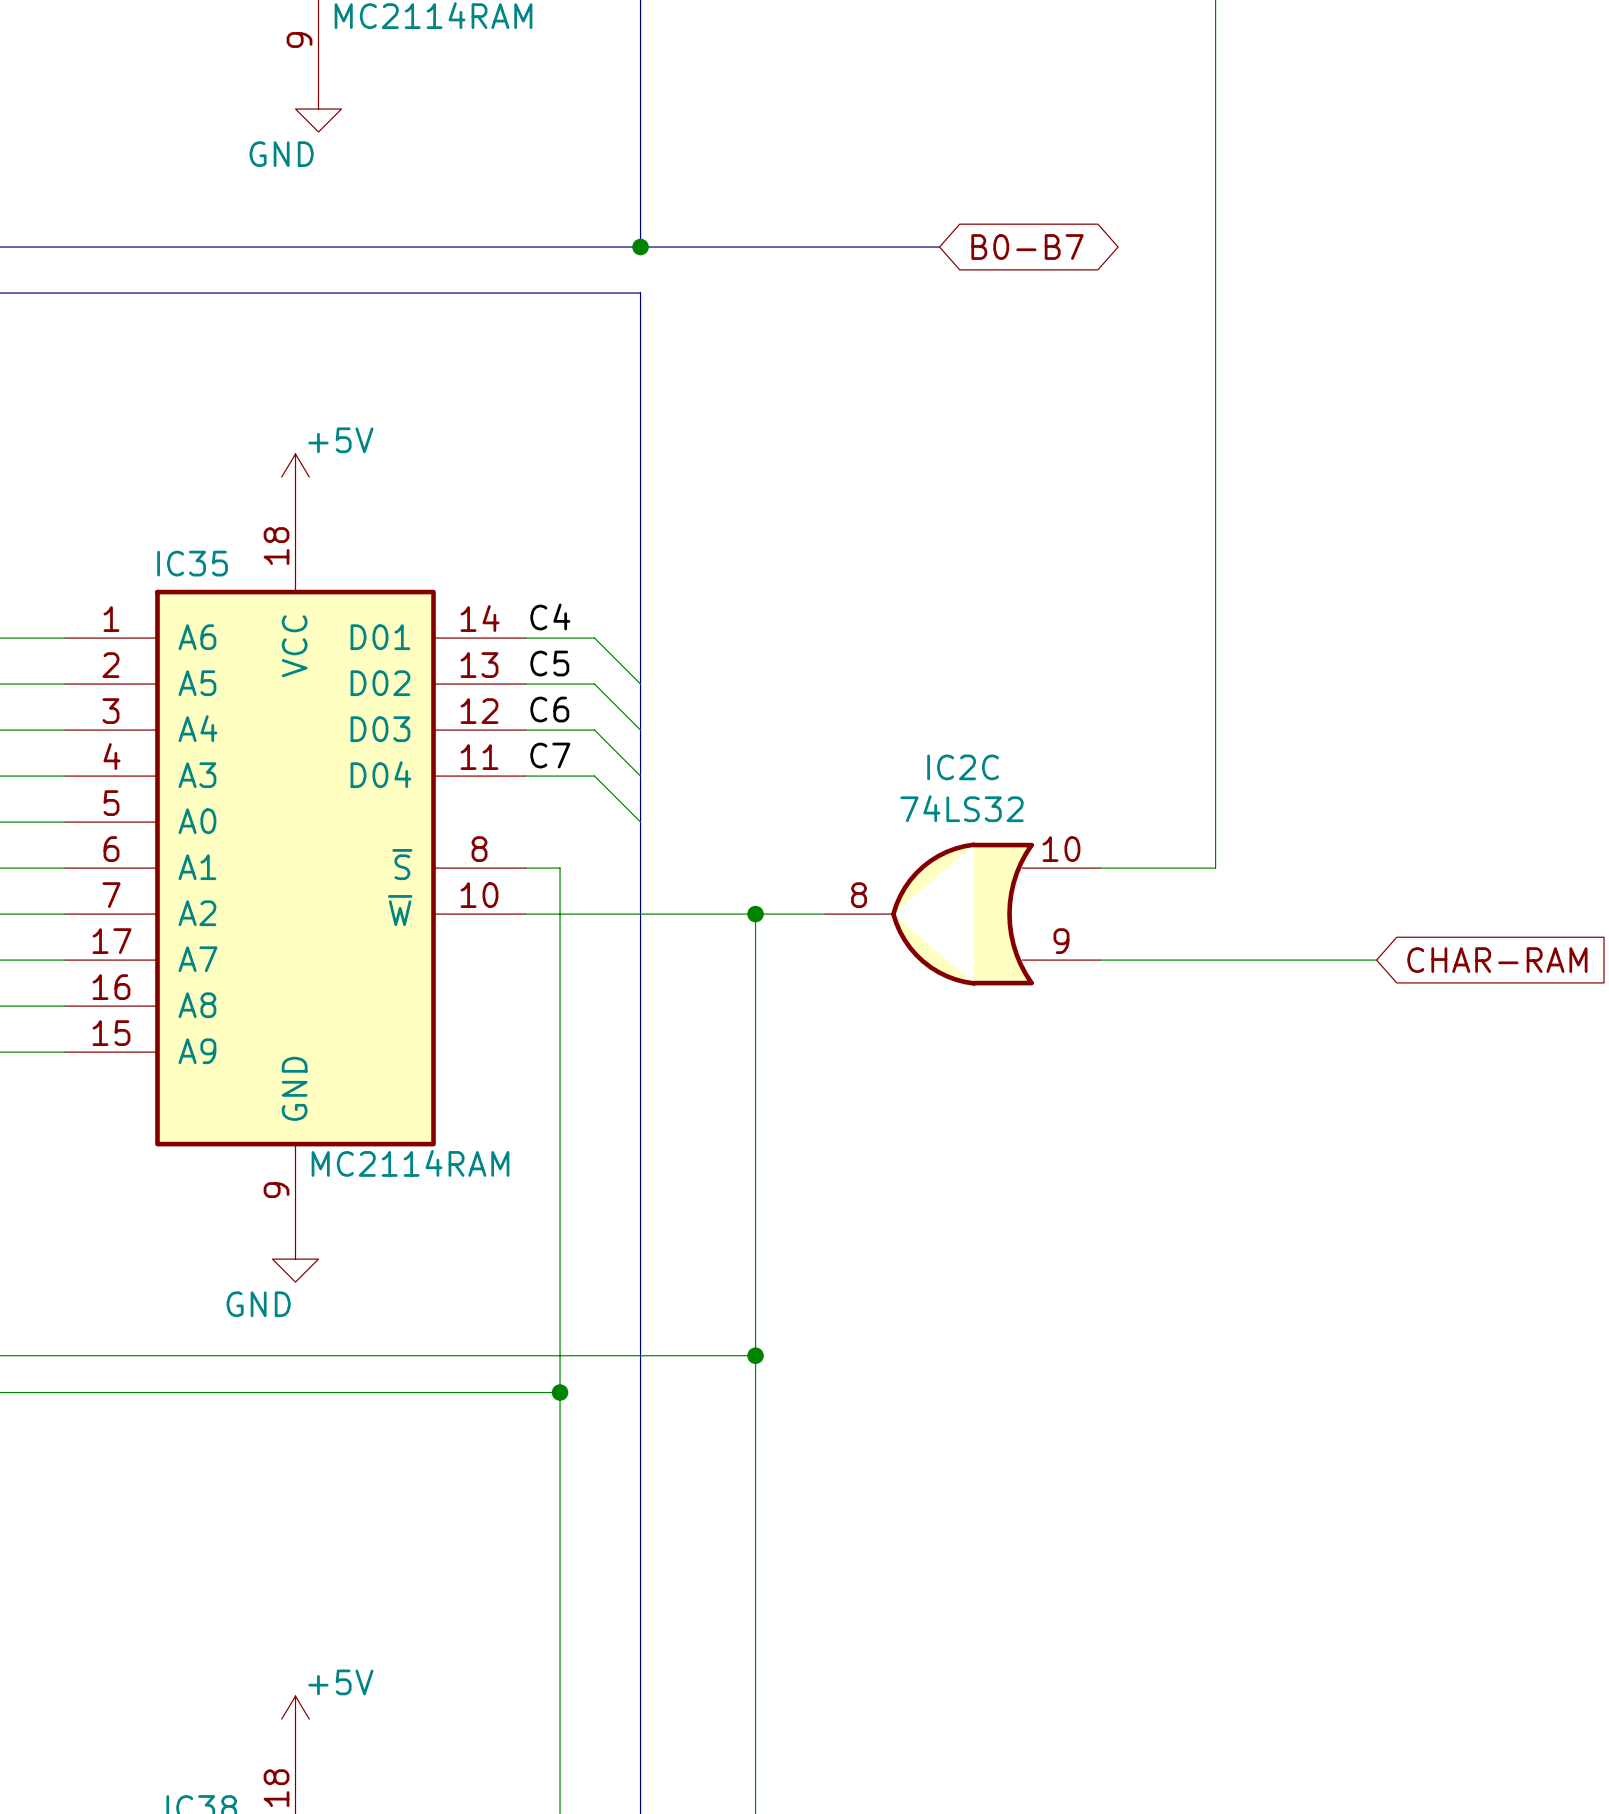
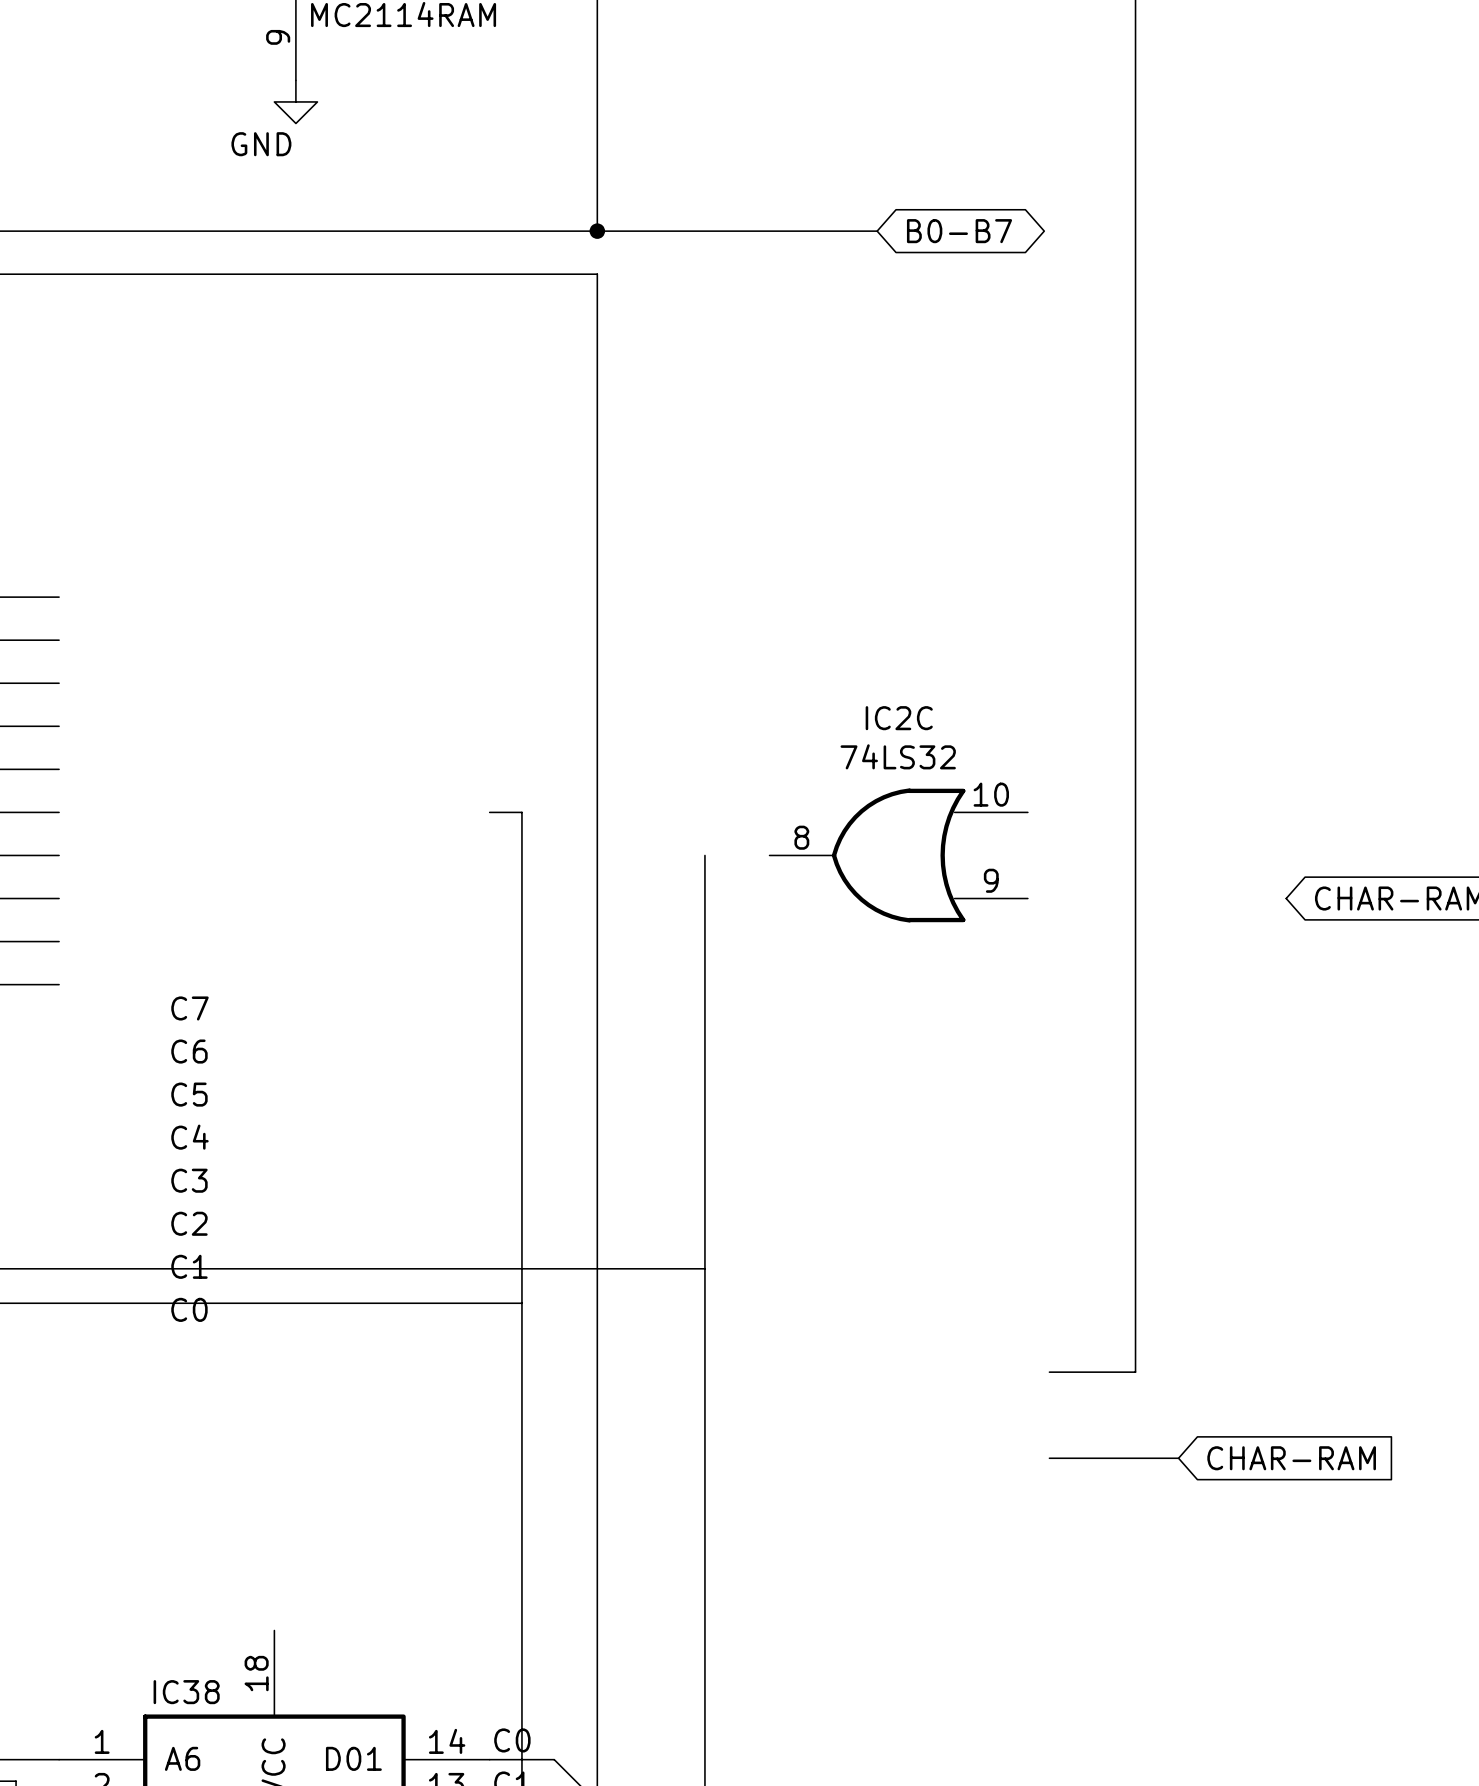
power symbol: +5V (295, 477) -> none
label: C4 (550, 616) -> none
wire: (525, 638) (594, 638) (640, 684) -> none
label: C5 (549, 663) -> none
wire: (525, 684) (594, 684) (640, 730) -> none
label: C6 (549, 709) -> none
wire: (525, 730) (594, 730) (640, 776) -> none
label: C7 (550, 755) -> none
wire: (525, 776) (594, 776) (640, 822) -> none
IC35: MC2114RAM (295, 868) -> none
wire: (1100, 868) (1215, 868) -> (1049, 1372) (1135, 1372) (1135, 812)
wire: (525, 914) (824, 914) -> none
junction: (755, 914) -> none
wire: (1100, 960) (1376, 960) -> none
label: none -> C7 (189, 1008)
label: none -> C6 (189, 1051)
label: none -> C5 (189, 1094)
label: none -> C4 (189, 1137)
power symbol: GND (295, 1259) -> none
label: none -> C3 (189, 1180)
label: none -> C2 (189, 1223)
label: none -> C1 (189, 1266)
junction: (755, 1355) -> none
junction: (560, 1392) -> none
label: none -> C0 (189, 1309)
wire: none -> (1049, 1458) (1178, 1458)
global label: none -> CHAR-RAM (1291, 1458)
power symbol: +5V (295, 1719) -> none

